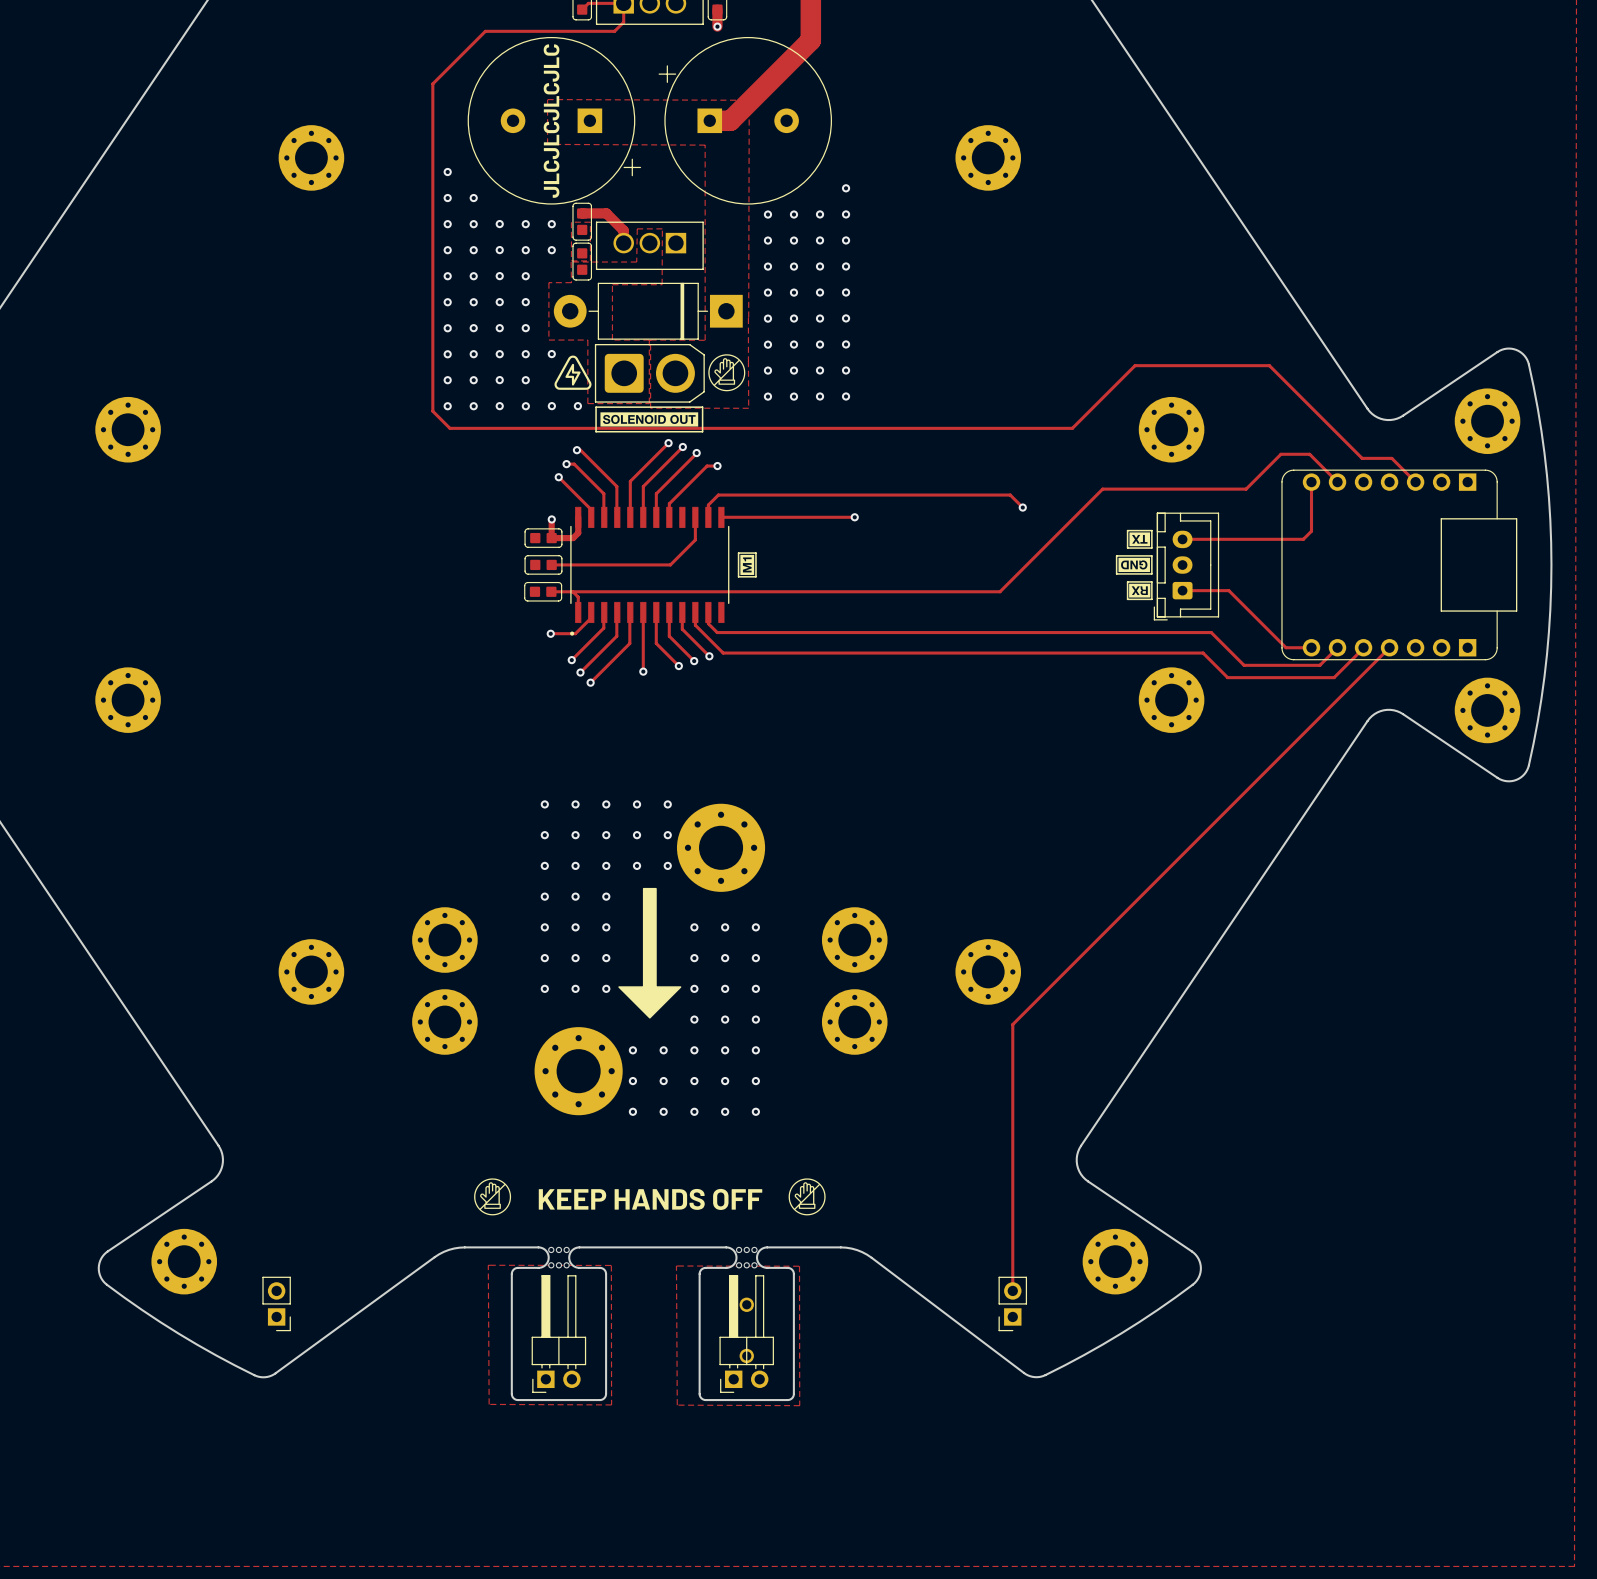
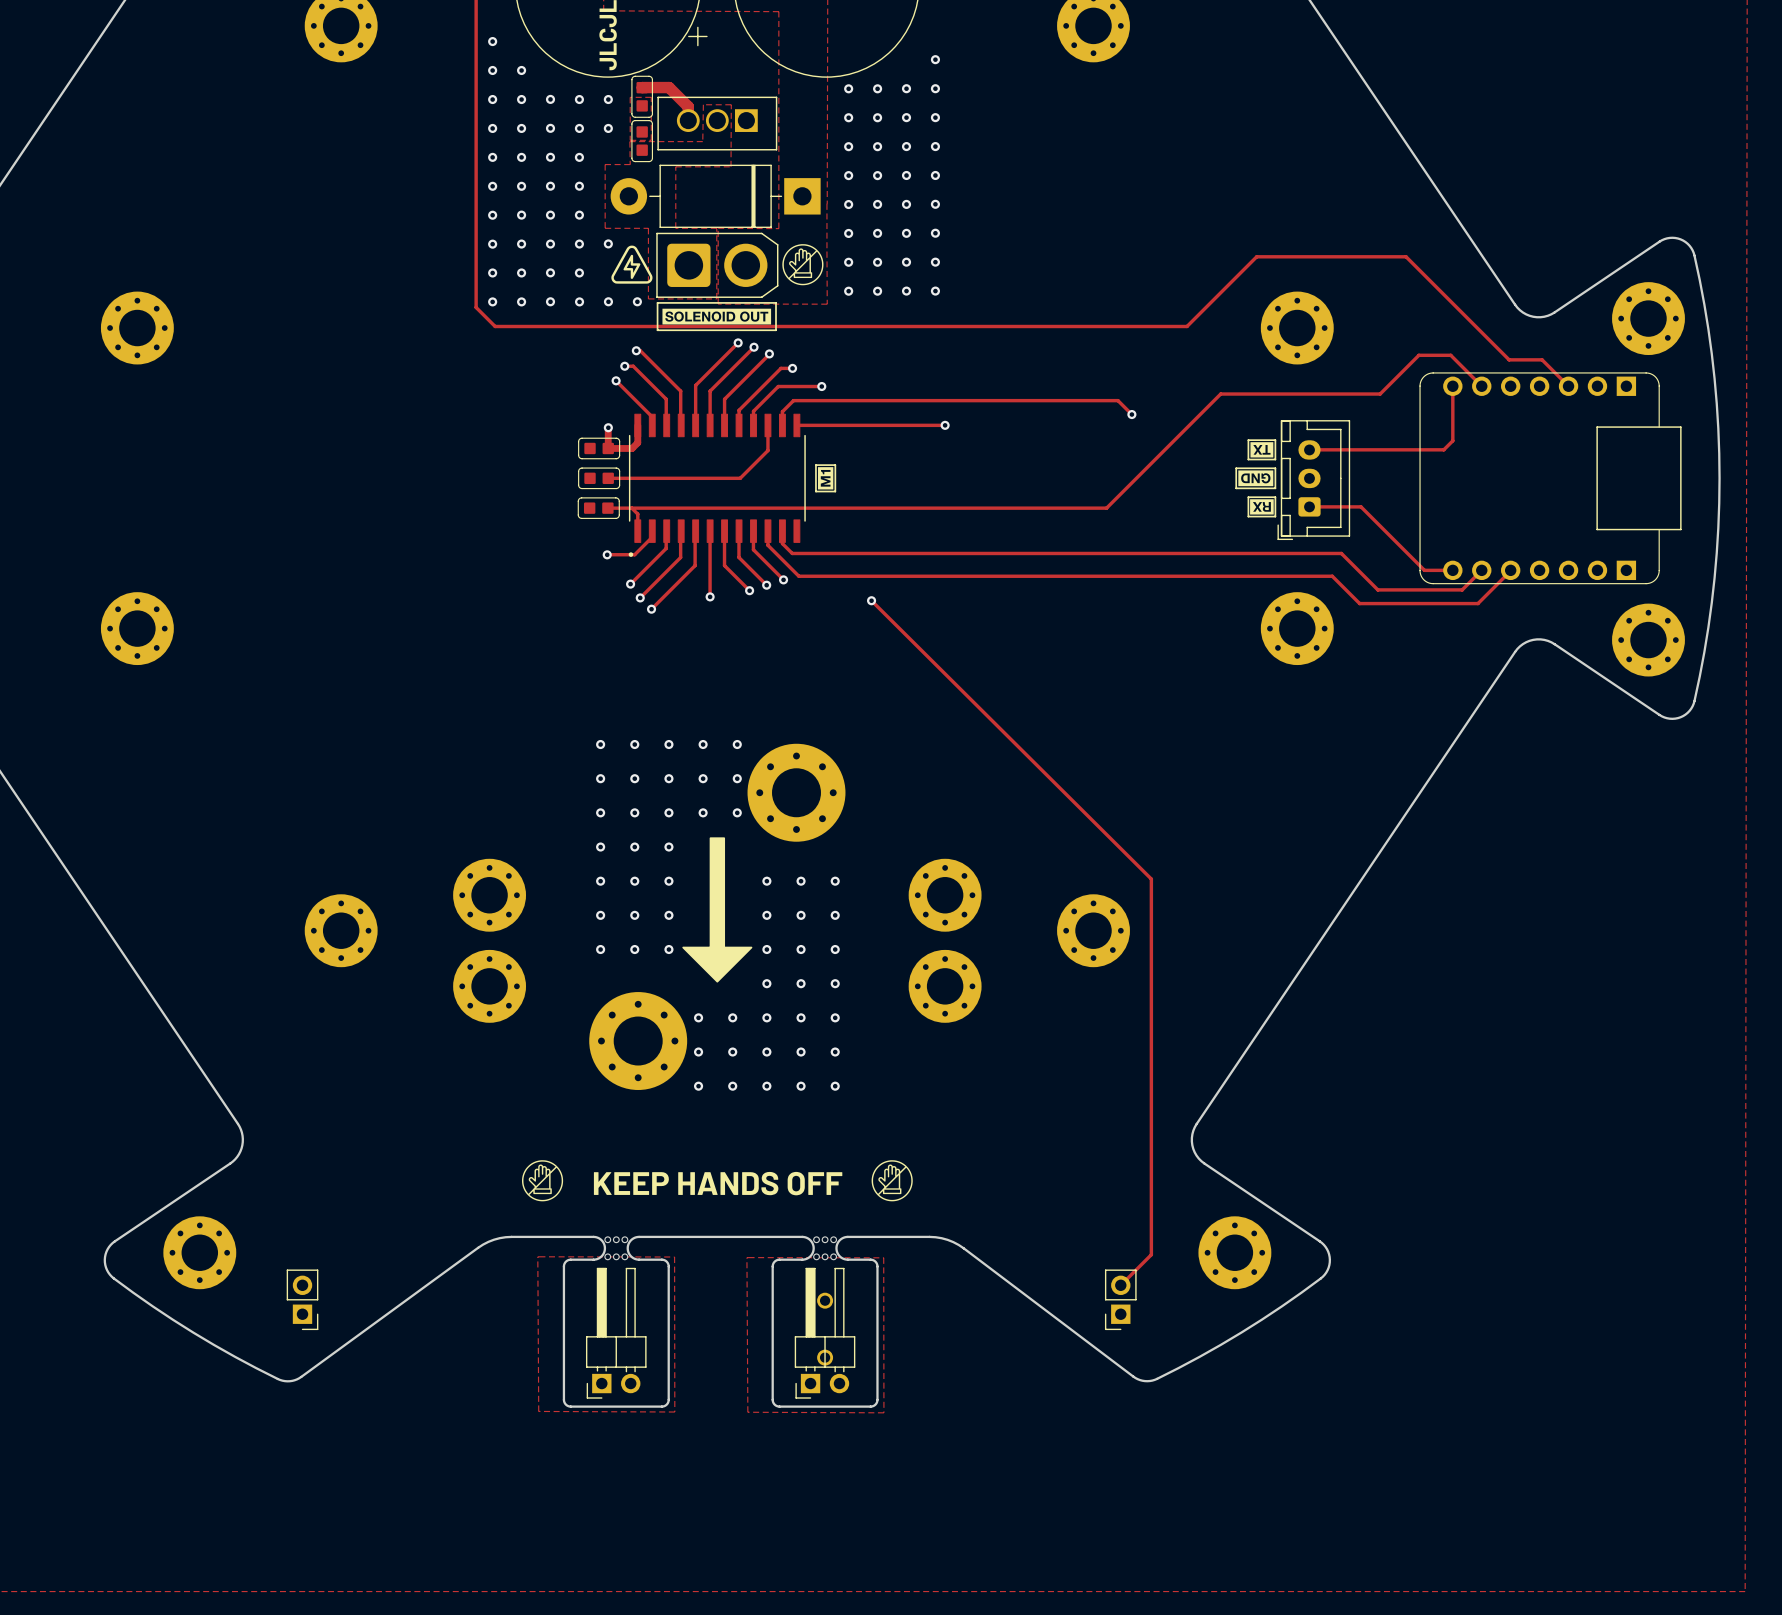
track: none -> (821, 386) (778, 386) (753, 411) (753, 425)
via: none -> (821, 386)
track: (1389, 647) (1012, 1024) (1012, 1290) -> (871, 600) (1151, 879) (1151, 1254) (1120, 1285)
via: none -> (871, 600)

